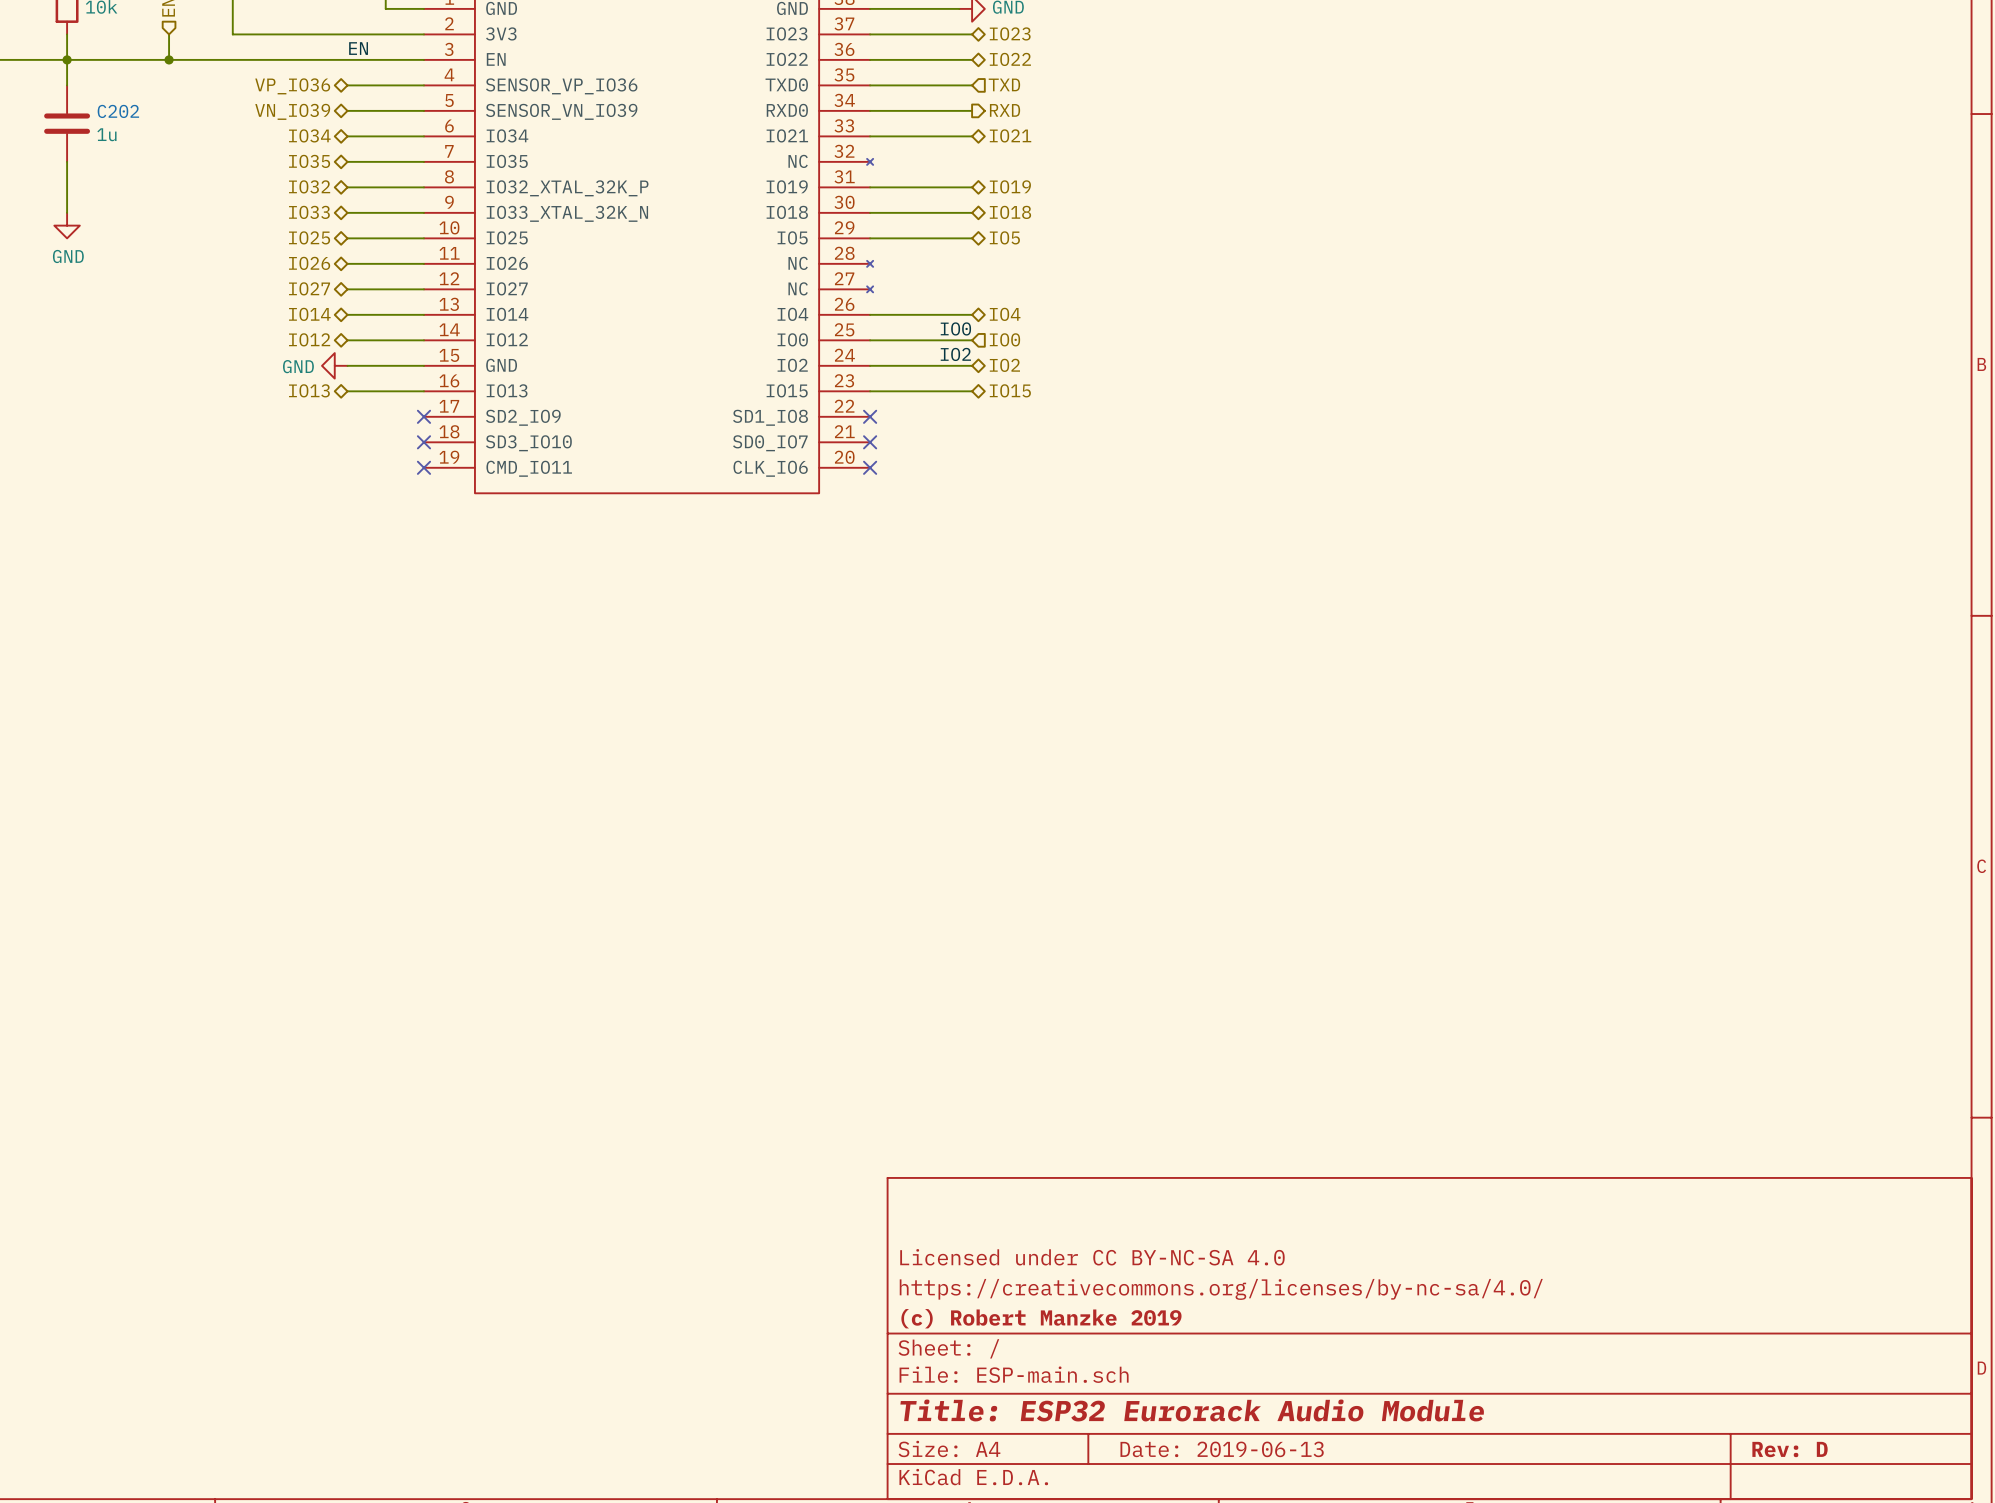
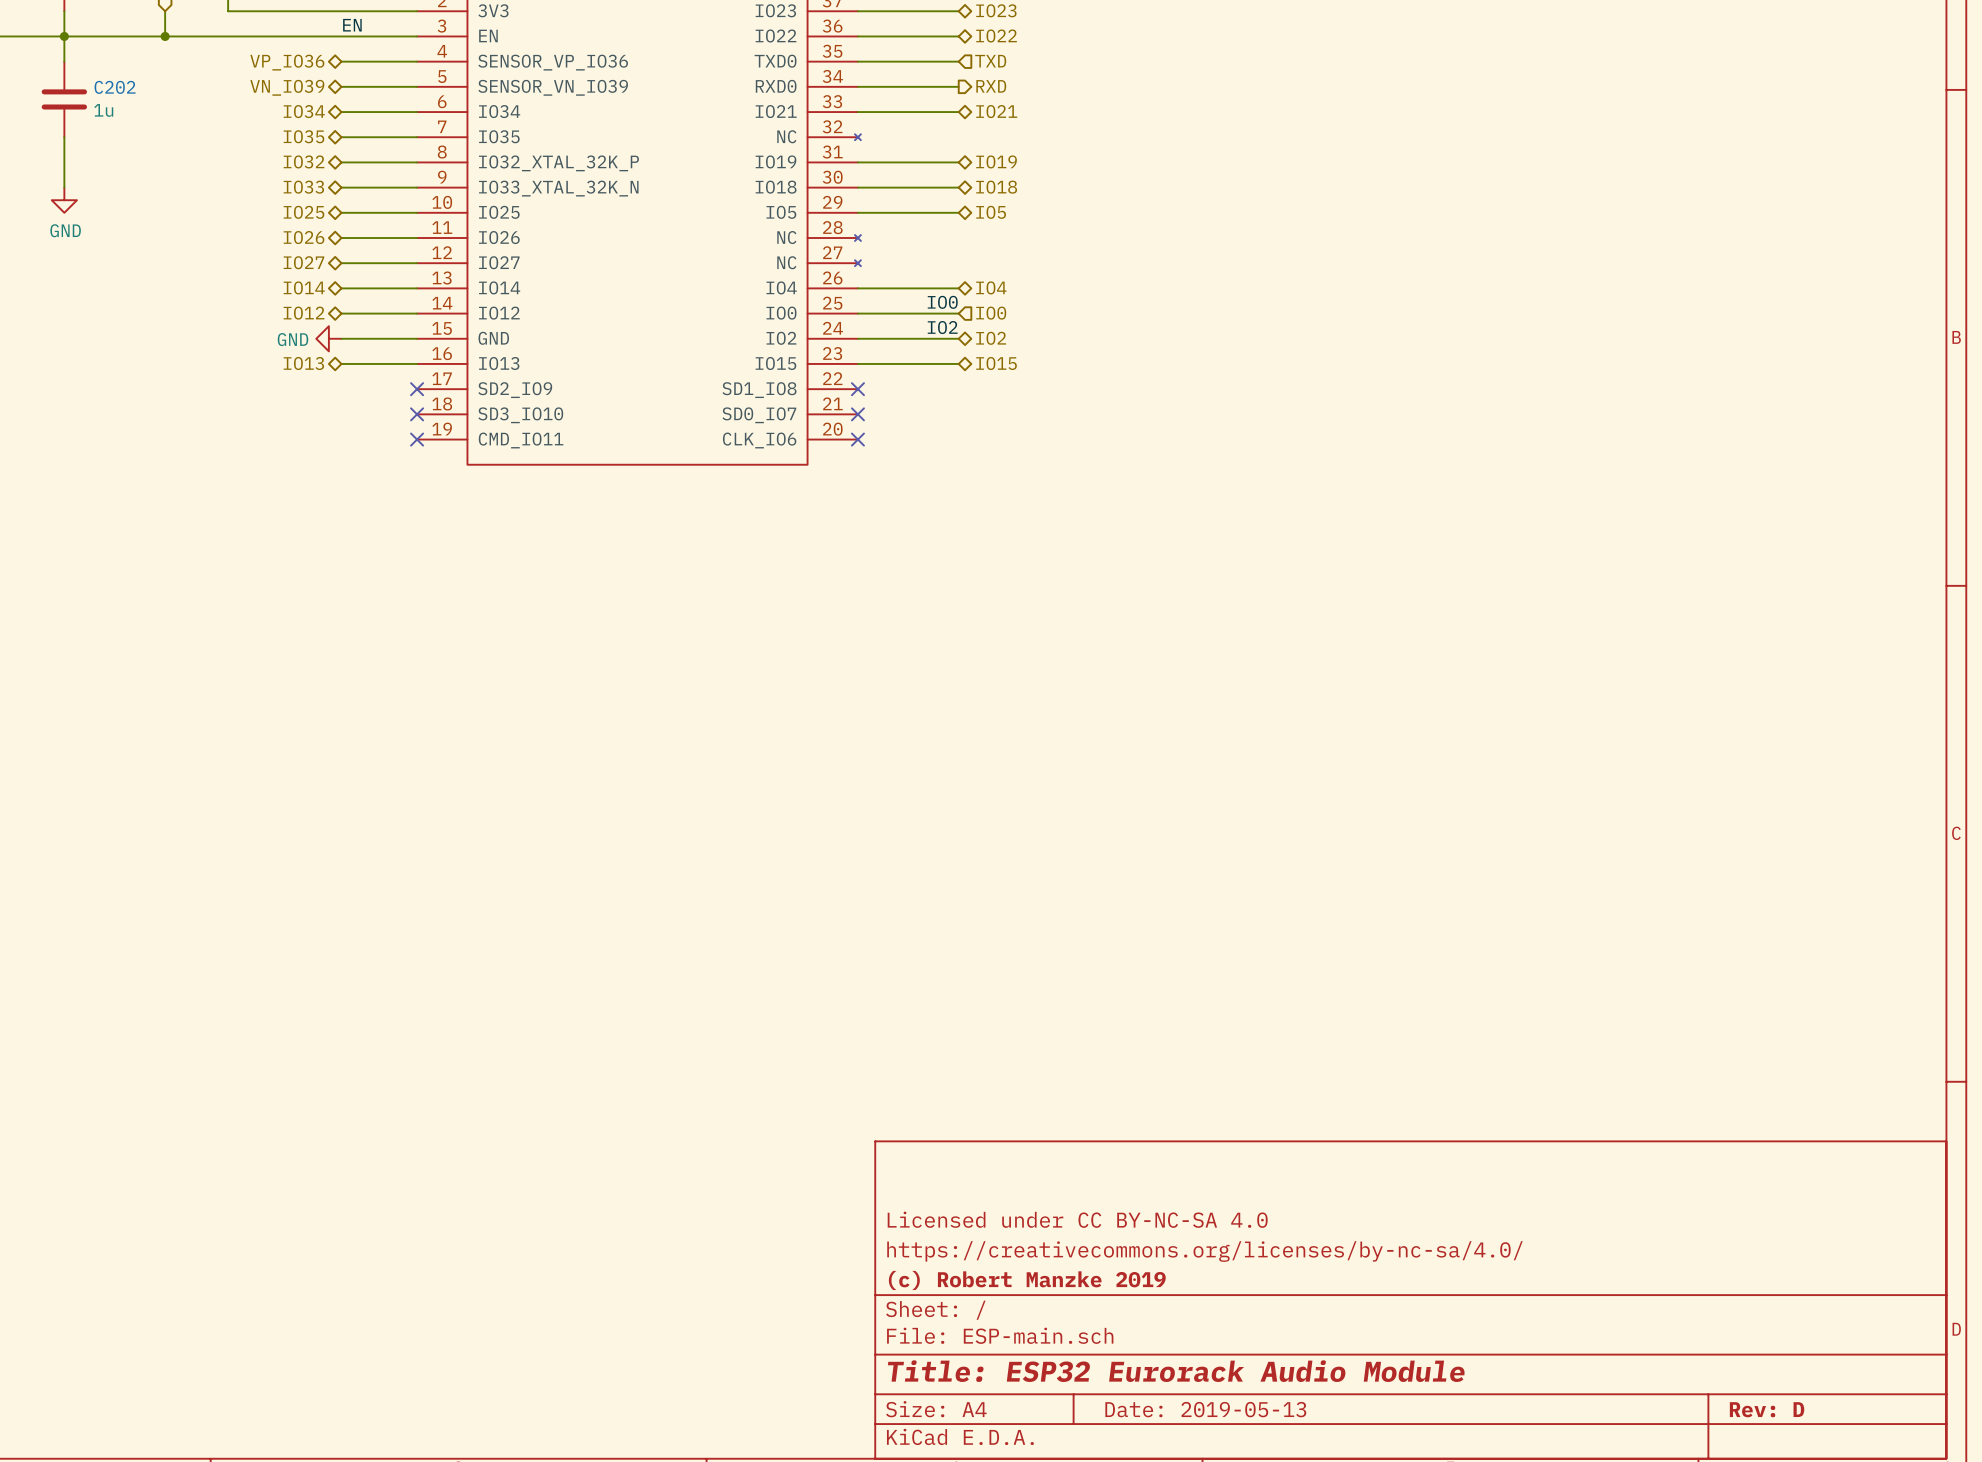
title block: Date: 2019-06-13 (1222, 1449) -> Date: 2019-05-13 (1205, 1409)

